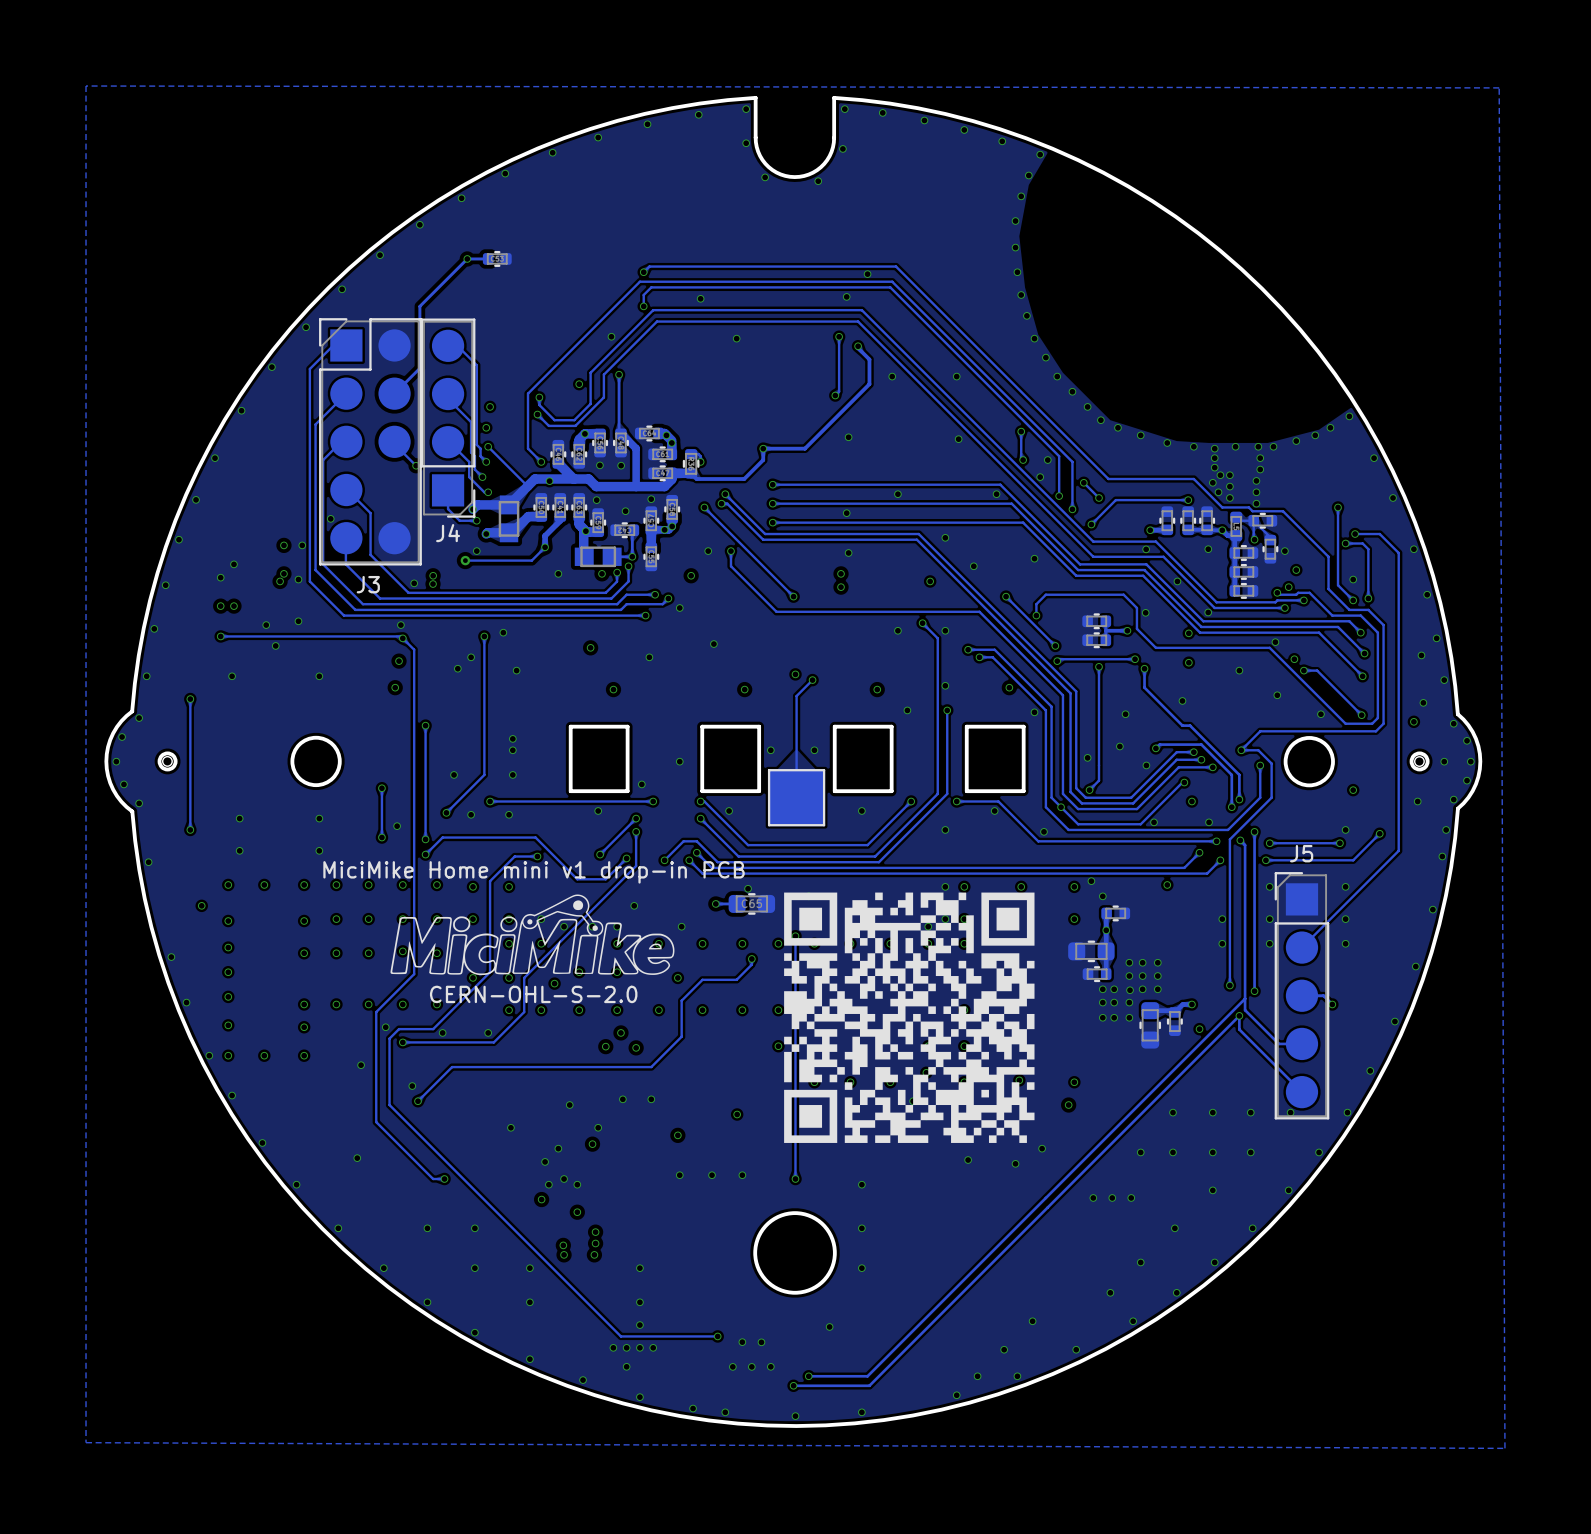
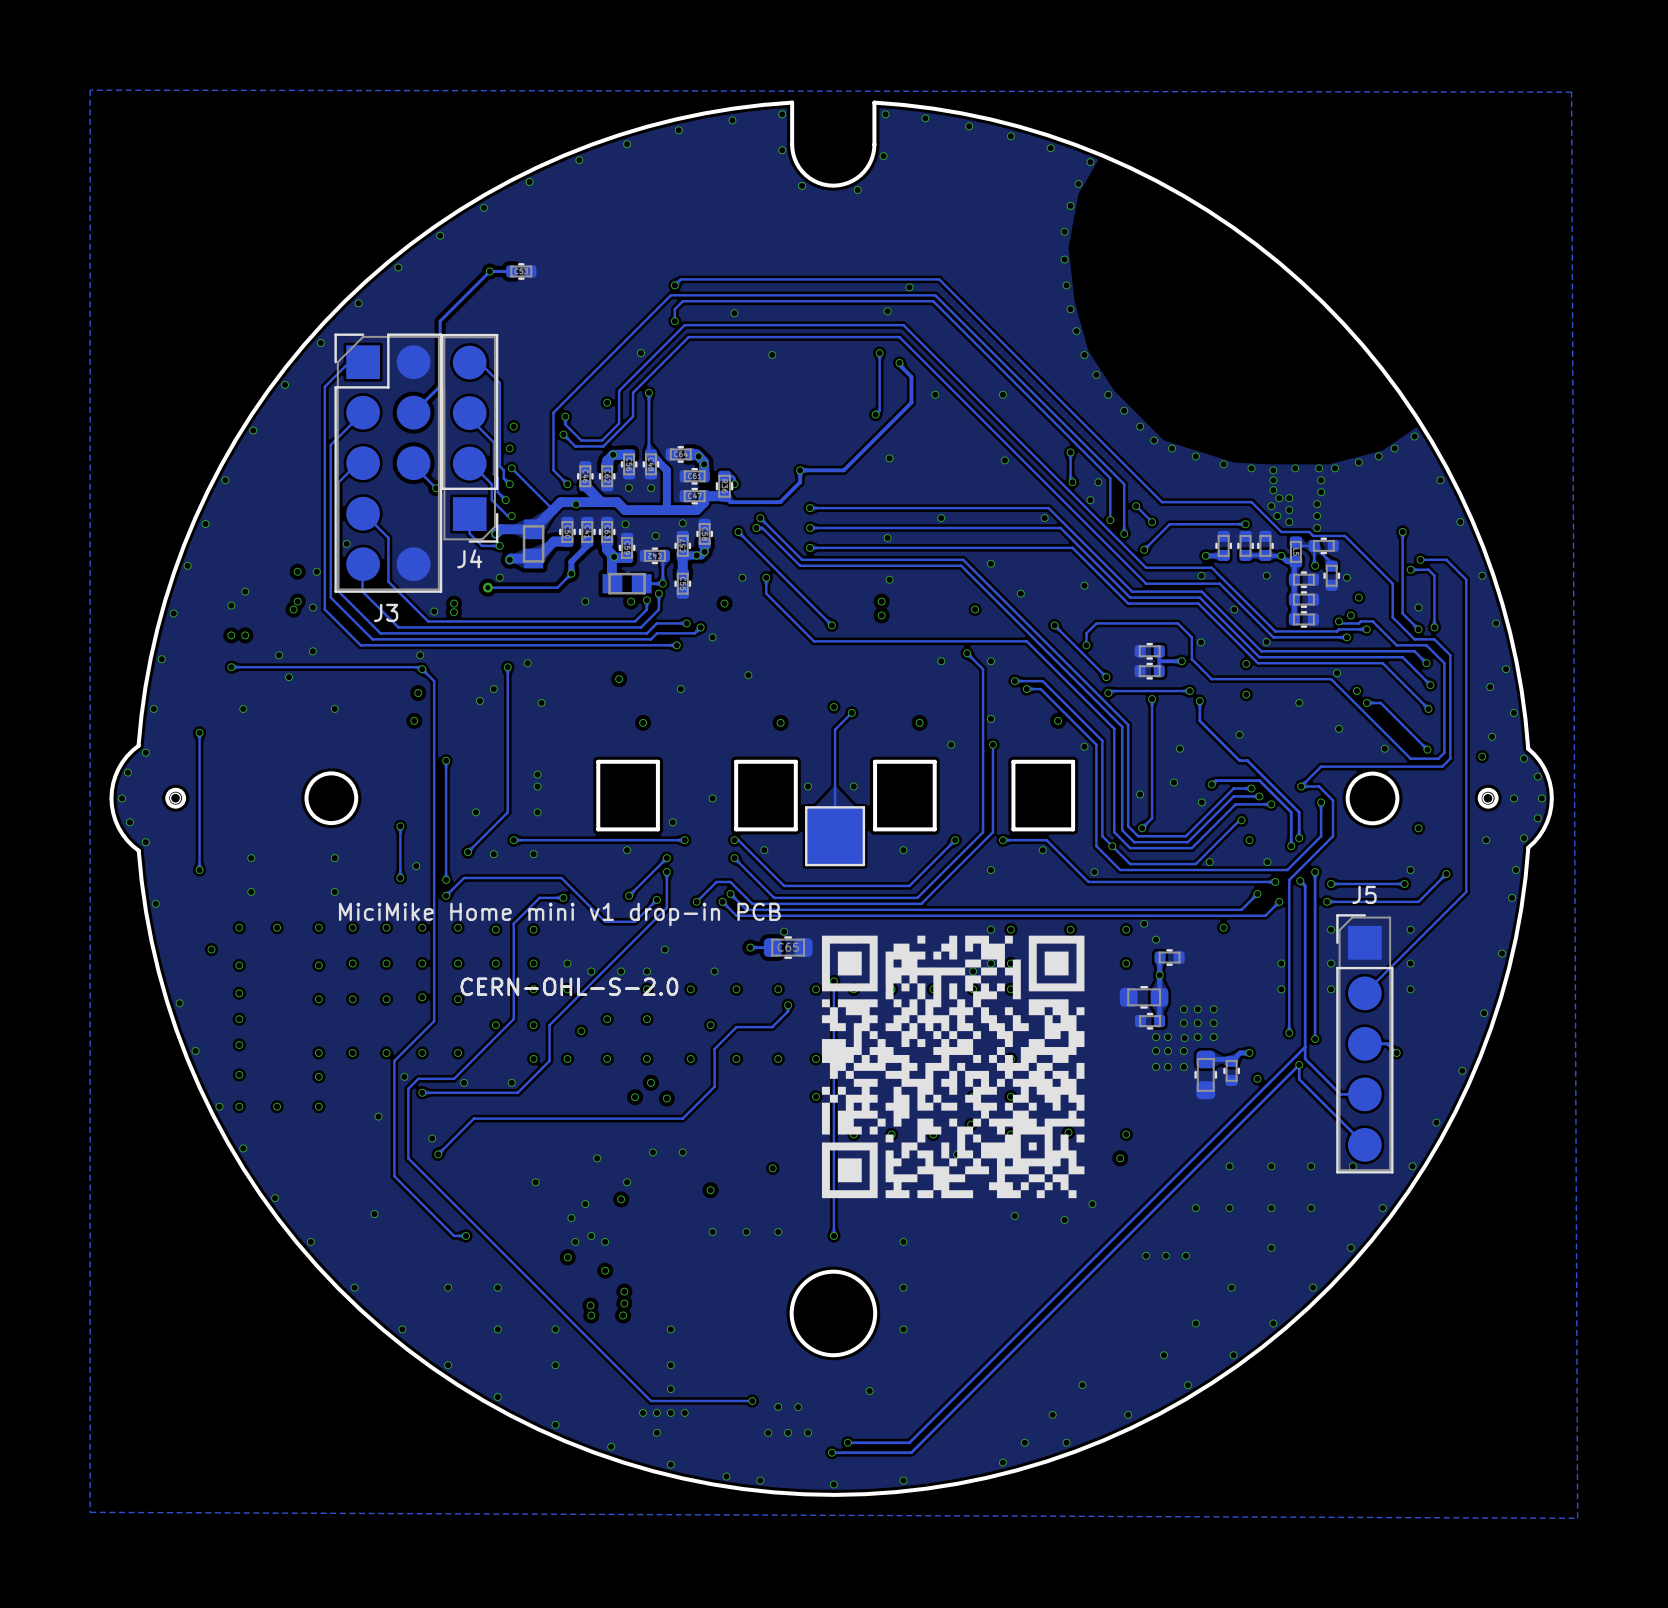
drawing: [390, 894, 675, 976] -> none
text position: CERN-OHL-S-2.0 (533, 994) -> CERN-OHL-S-2.0 (569, 986)

